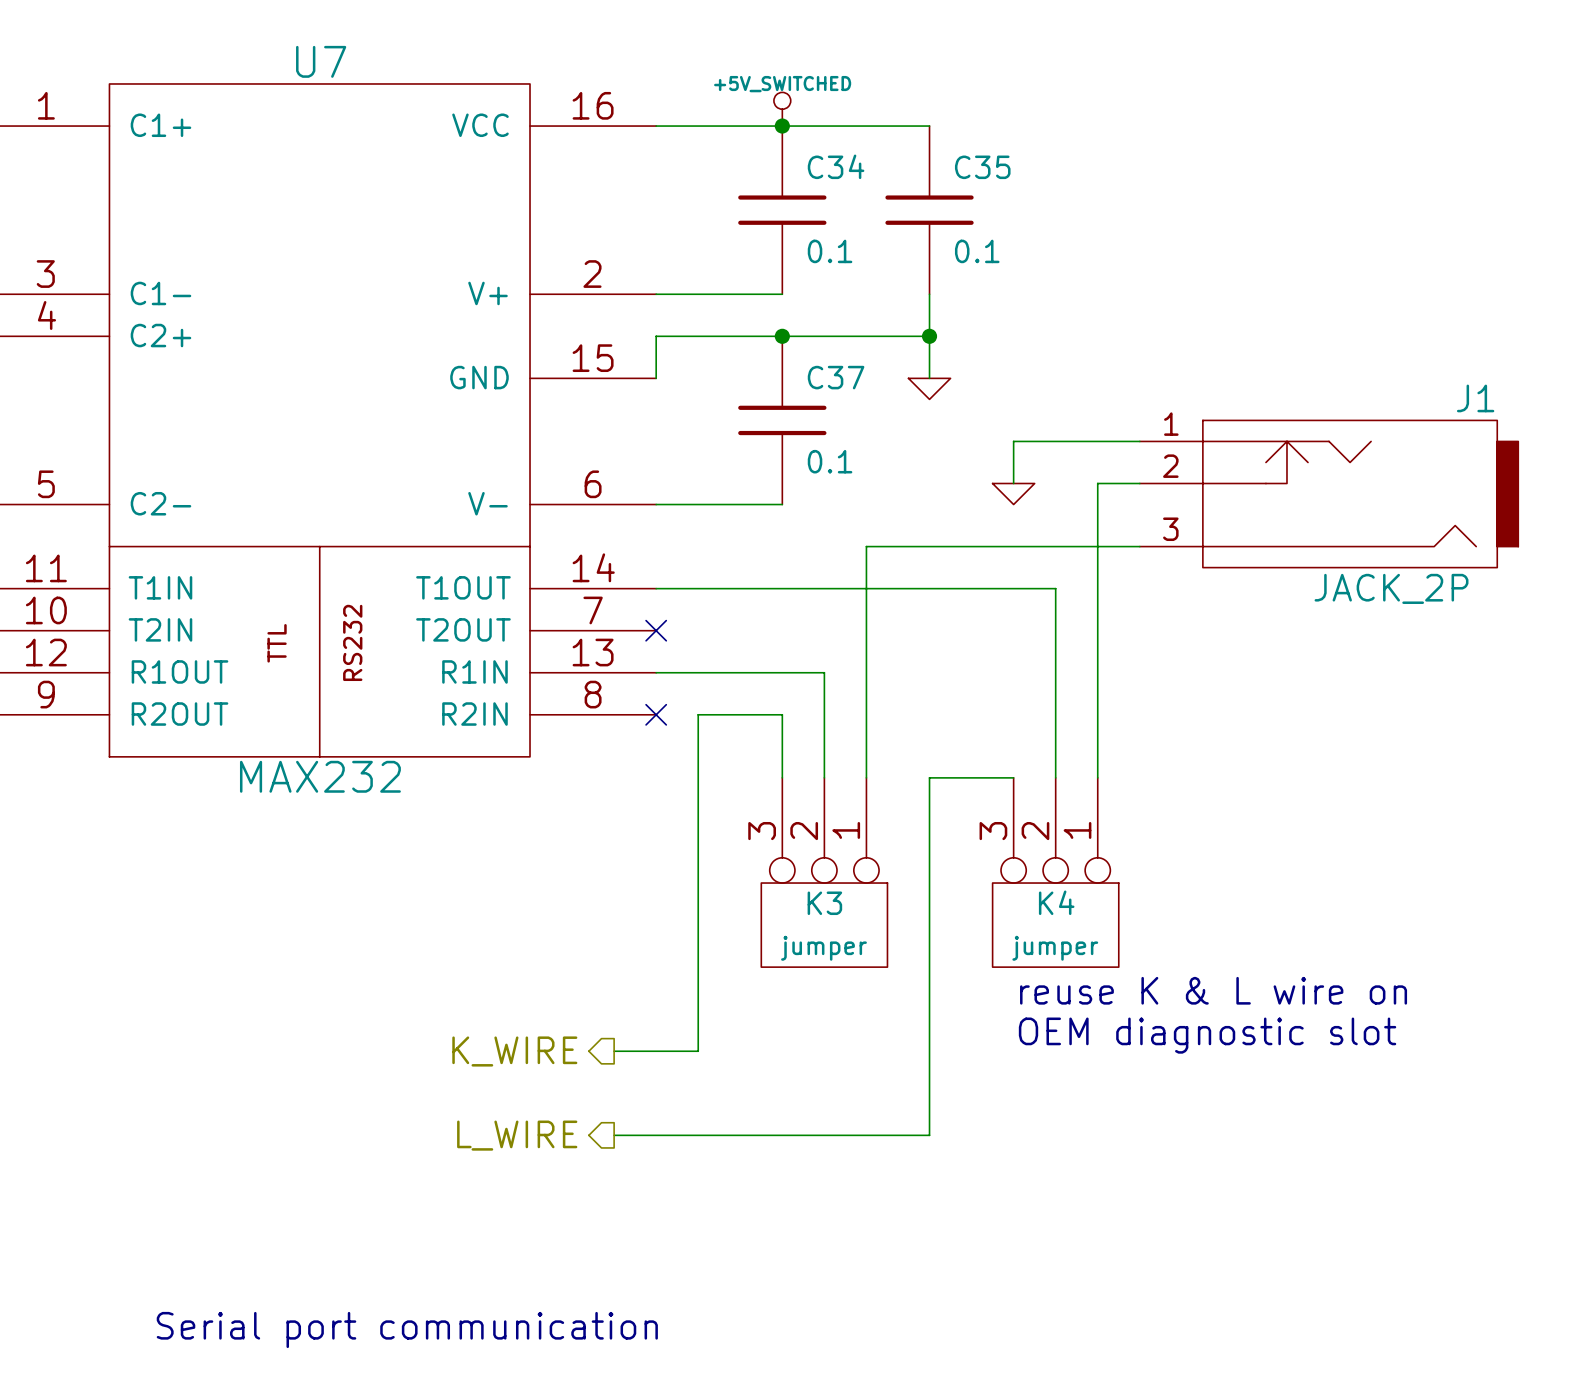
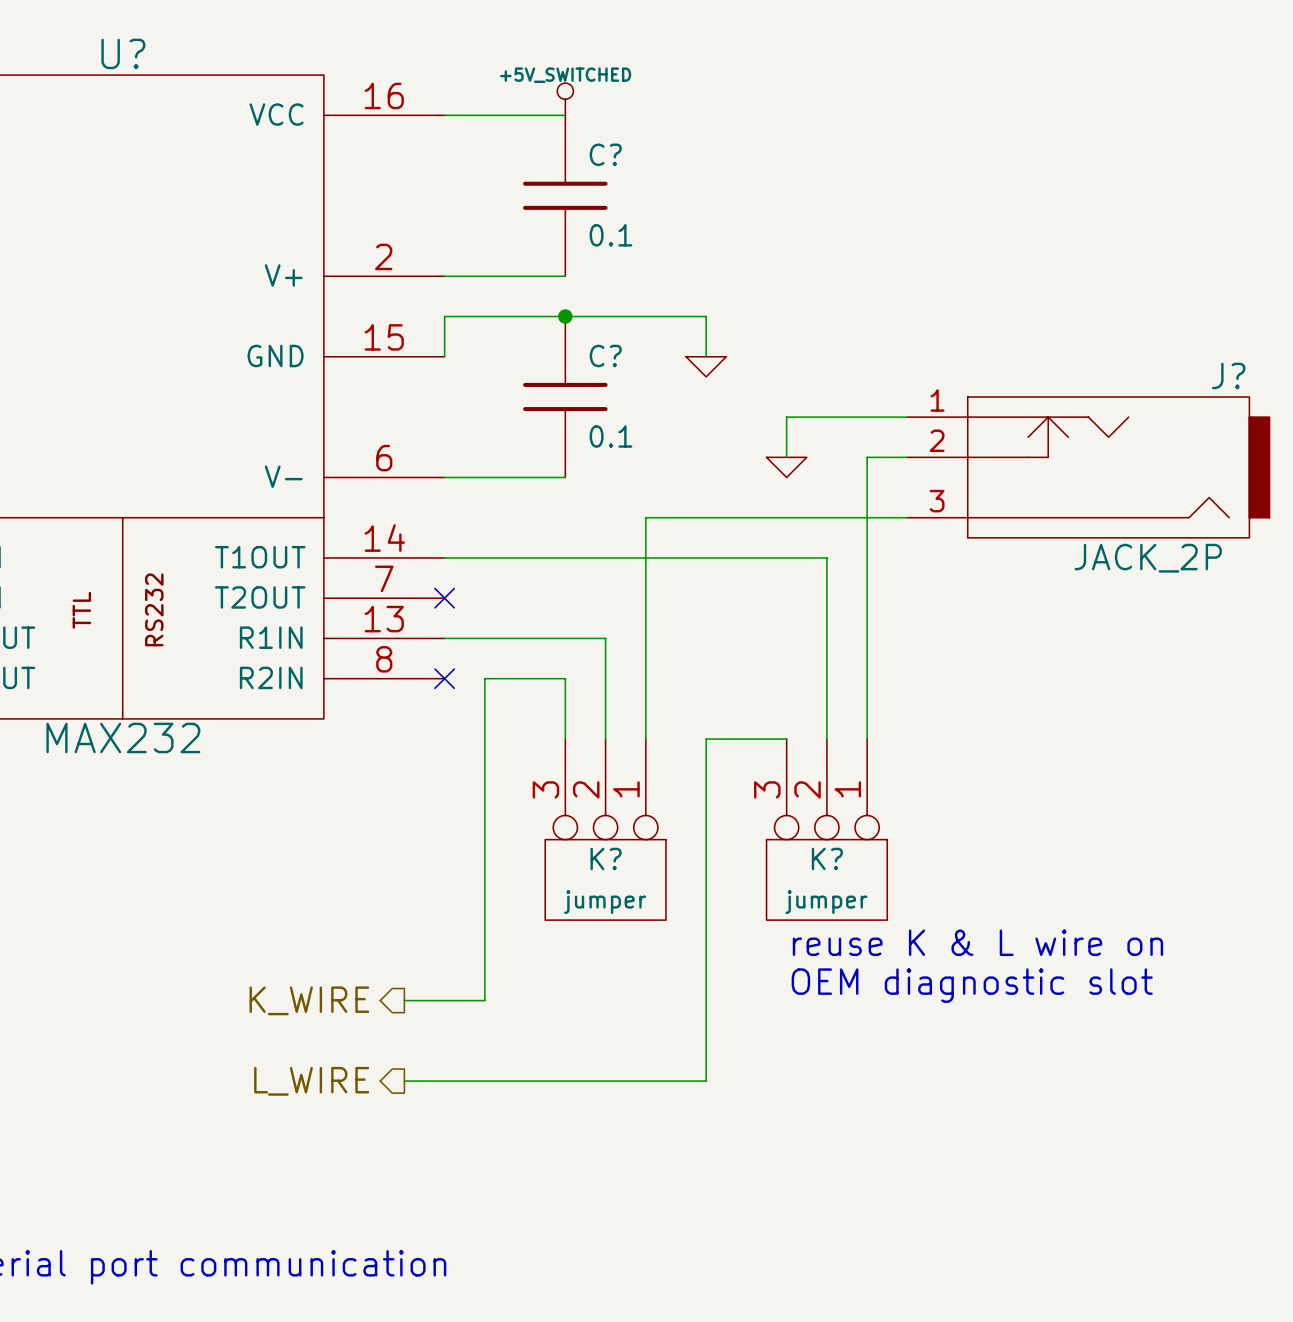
U7 name: U7 (321, 61) -> U? (123, 53)
wire: (782, 126) (929, 126) -> none
junction: (782, 126) -> none
C34 name: C34 (836, 166) -> C? (605, 154)
C35: 0.1 (929, 210) -> none
wire: (929, 294) (929, 336) -> none
junction: (929, 336) -> none
C37 name: C37 (836, 377) -> C? (605, 356)
J1 name: J1 (1475, 398) -> J? (1228, 375)
K4 name: K4 (1056, 902) -> K? (827, 859)
K3 name: K3 (824, 903) -> K? (606, 859)

